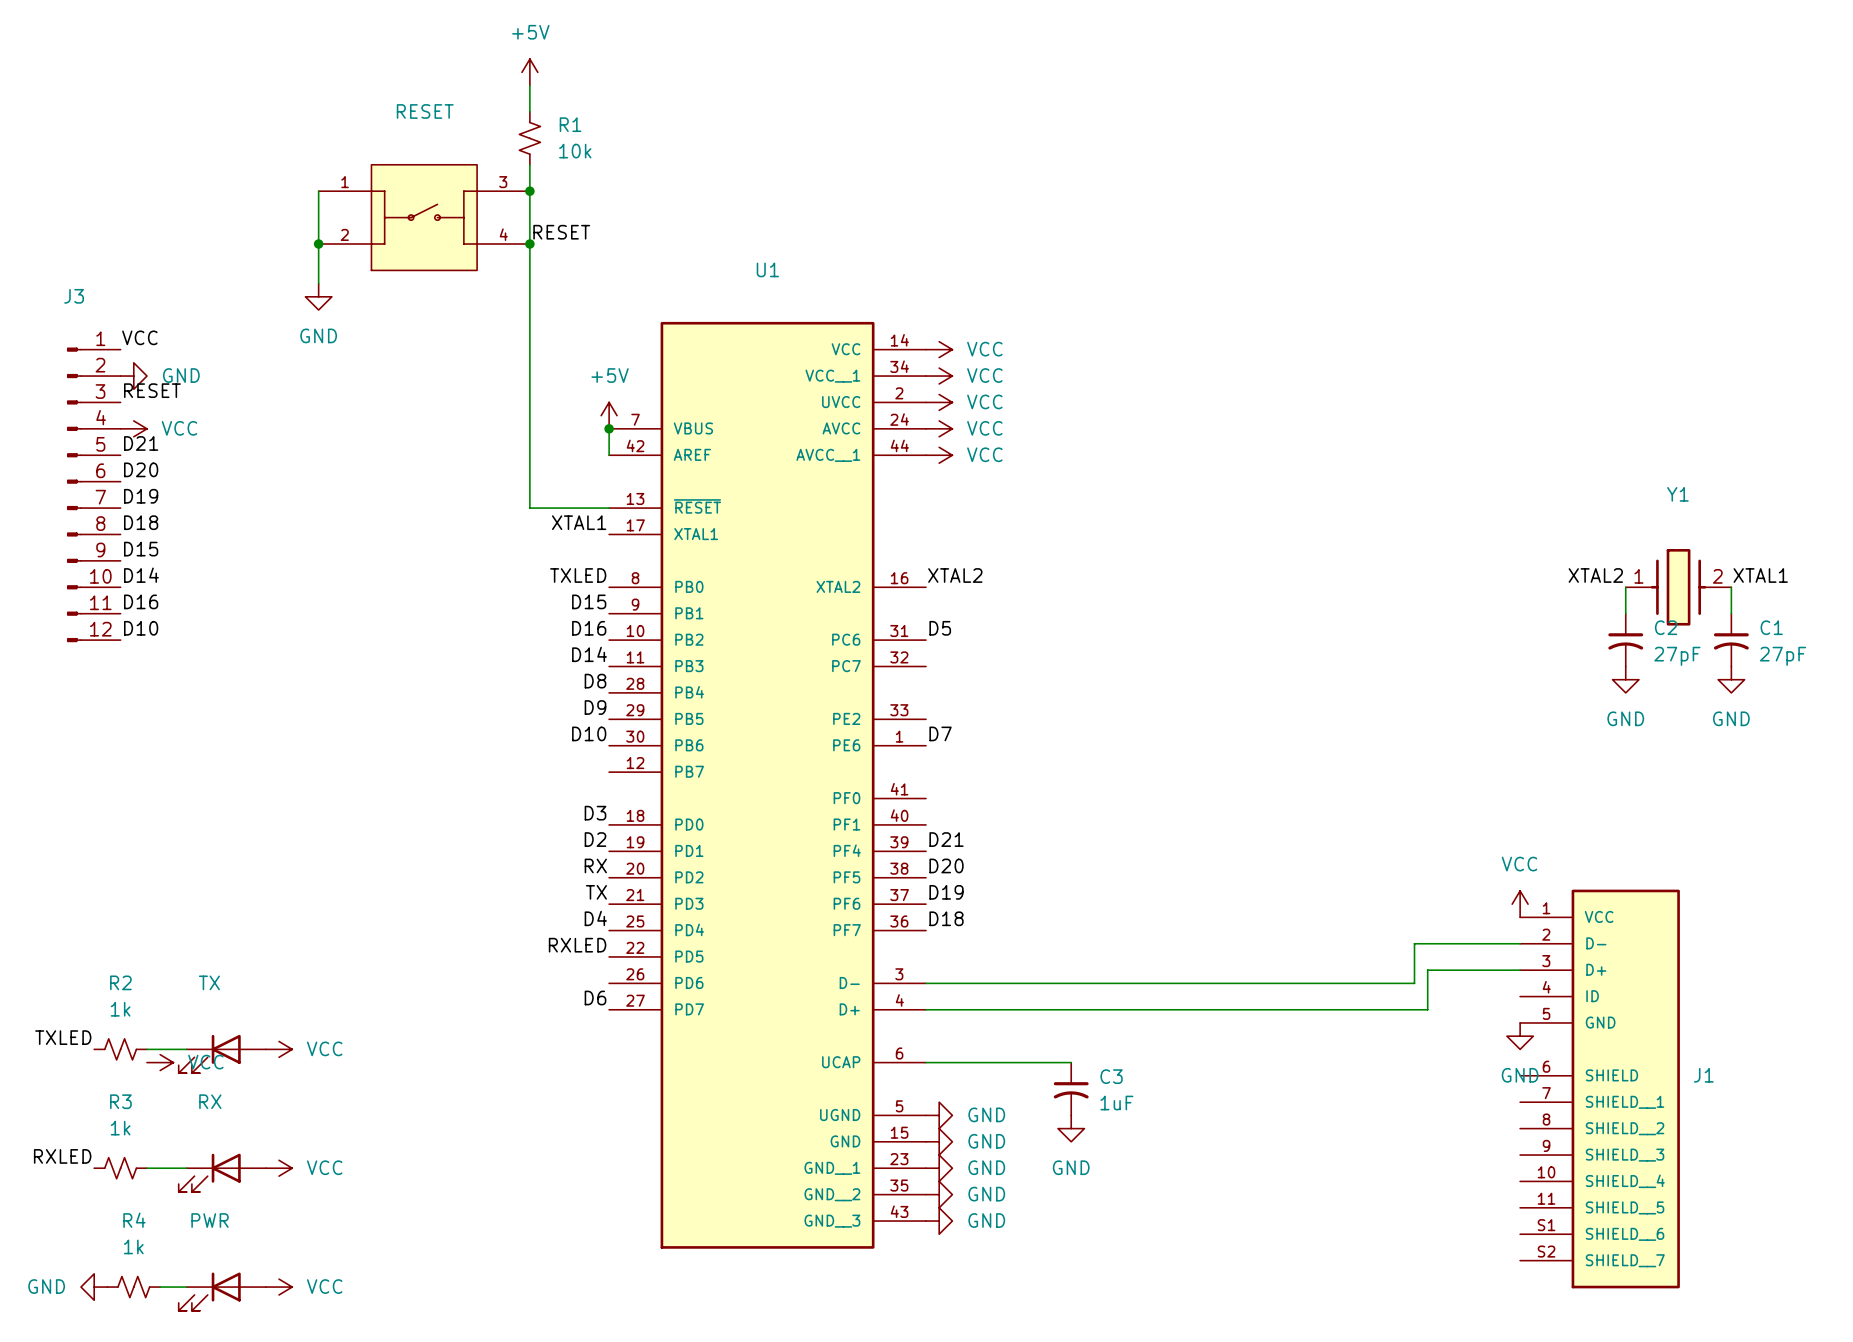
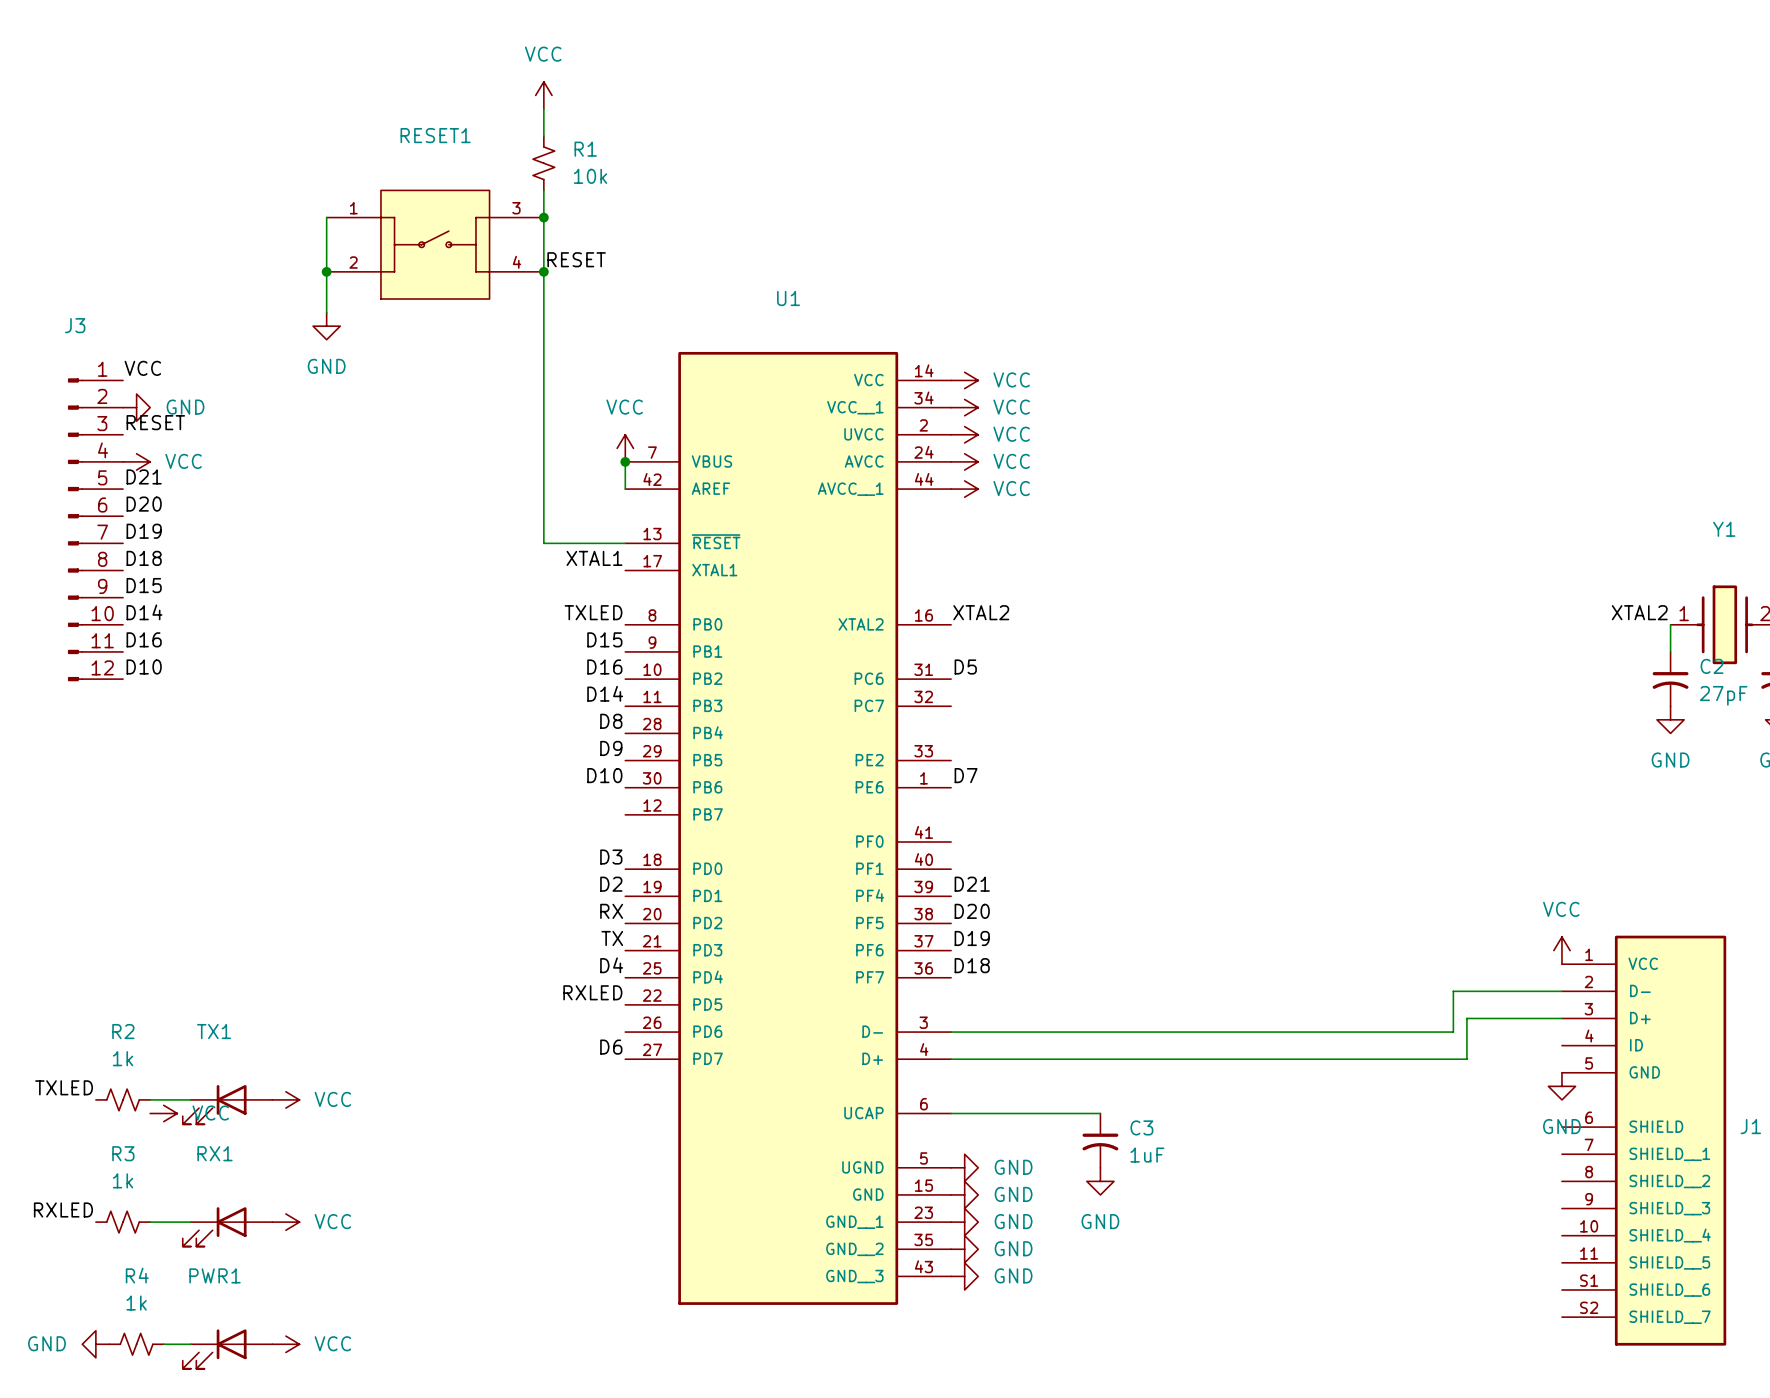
power symbol: +5V (529, 72) -> VCC (543, 95)
RESET name: RESET (425, 111) -> RESET1 (435, 135)
power symbol: +5V (609, 415) -> VCC (625, 448)
TX name: TX (209, 982) -> TX1 (214, 1031)
RX name: RX (210, 1101) -> RX1 (214, 1153)
PWR name: PWR (210, 1220) -> PWR1 (214, 1275)

